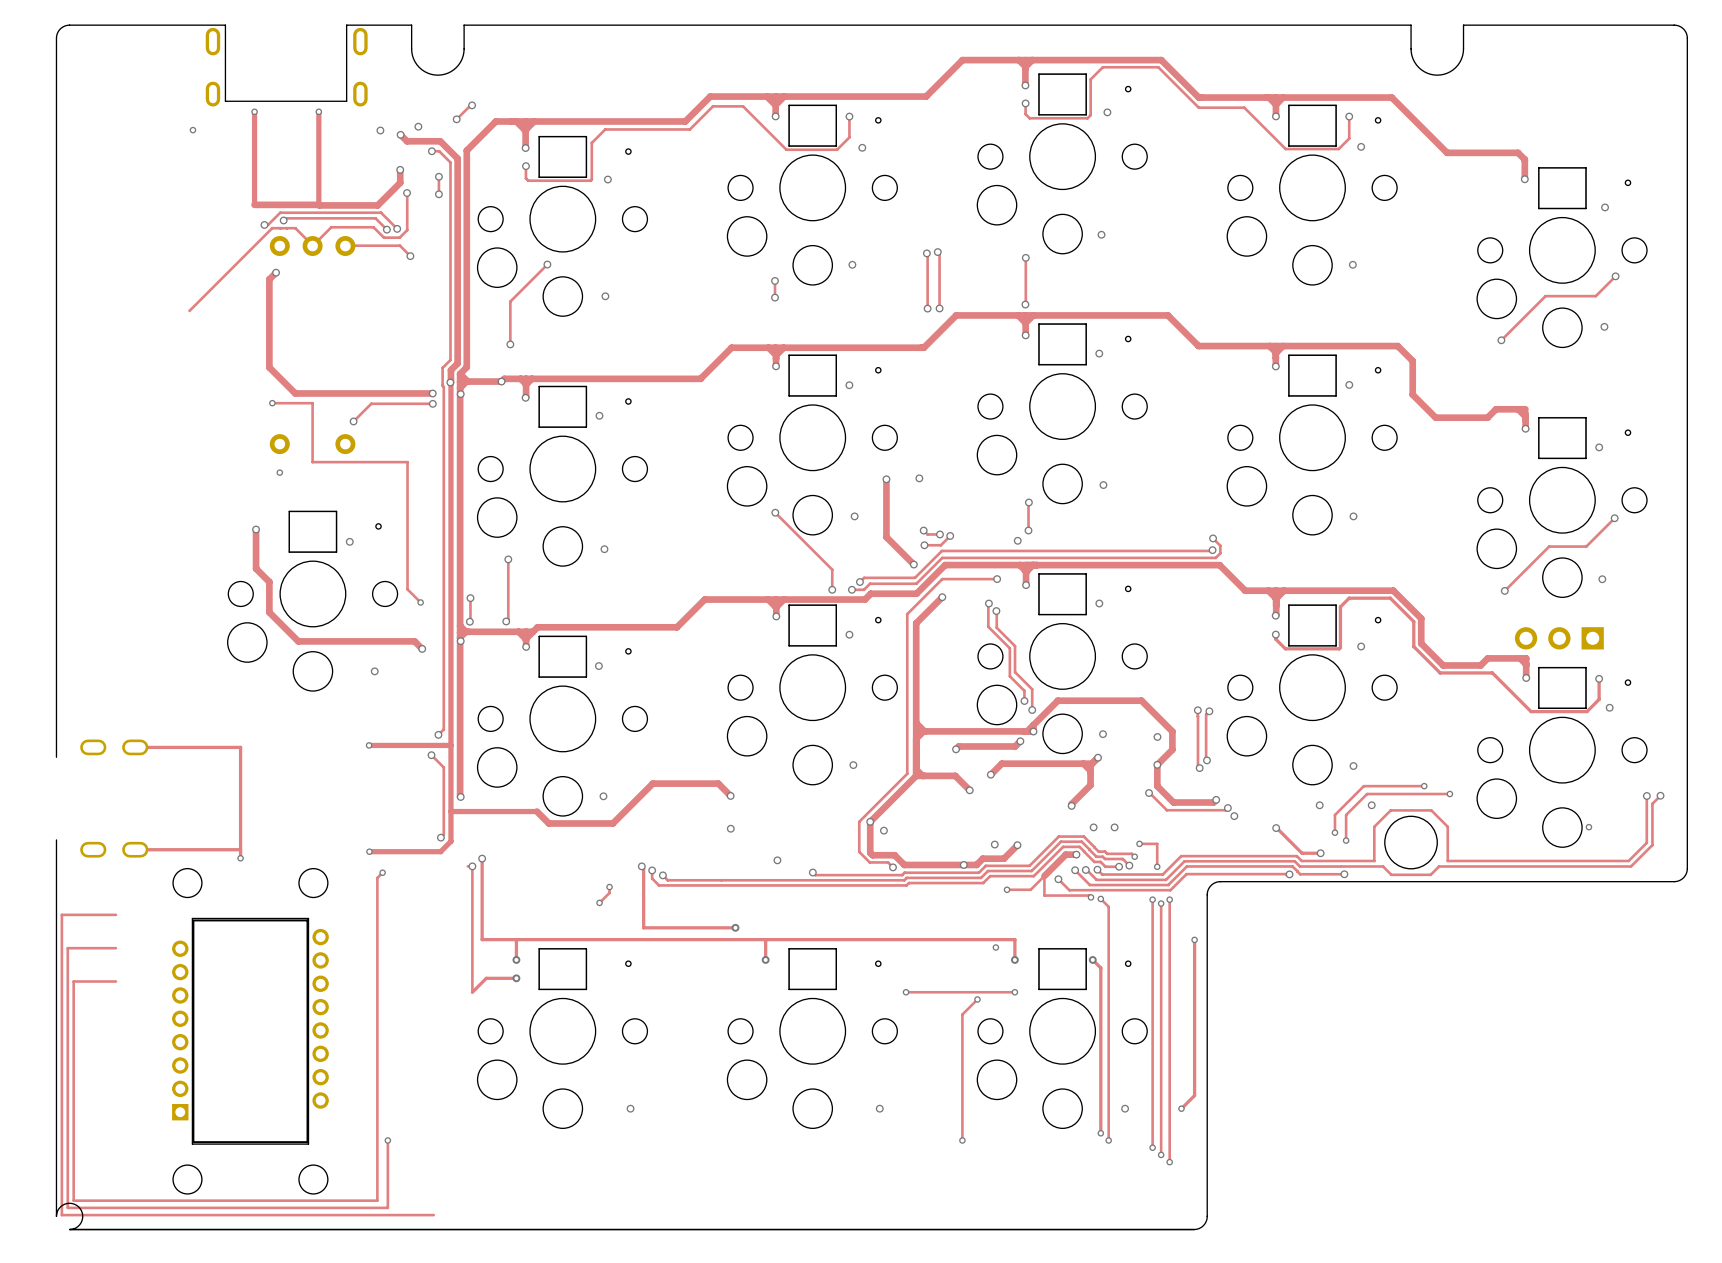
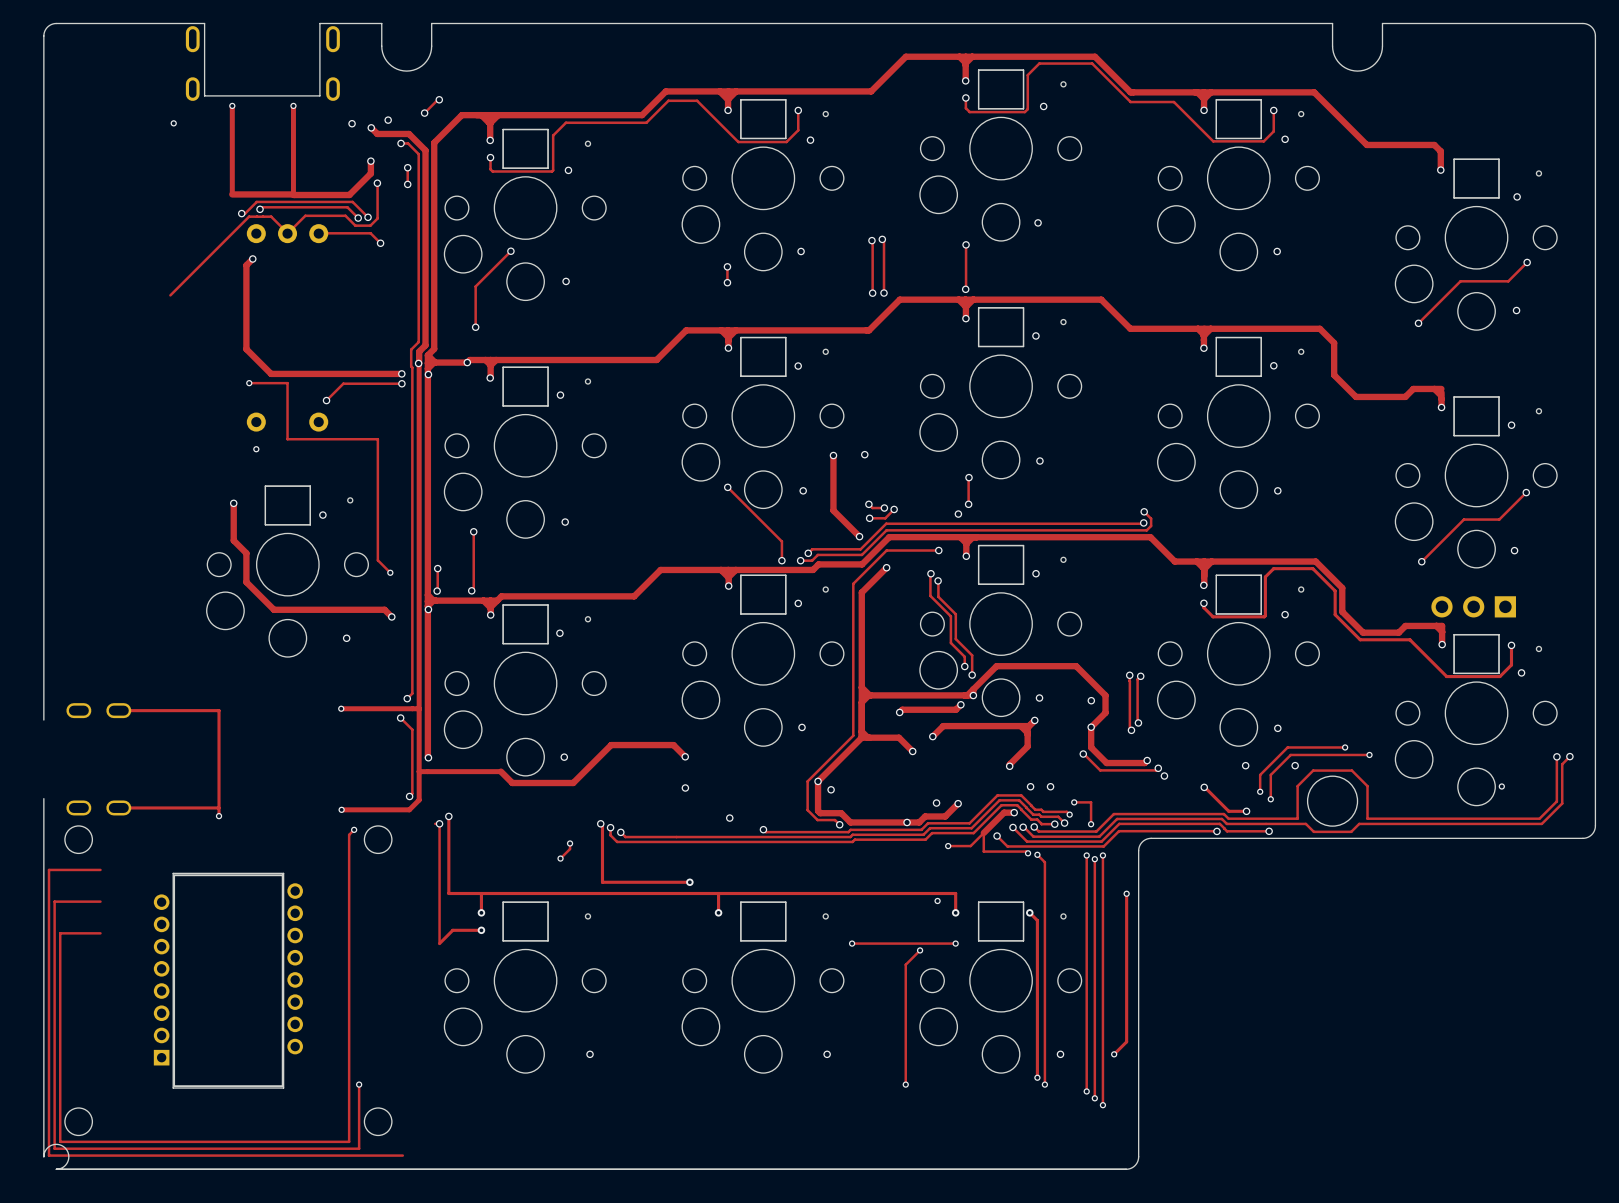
round board edge position: (187, 883) -> (78, 839)
round board edge position: (313, 883) -> (378, 839)
round board edge position: (187, 1179) -> (78, 1121)
round board edge position: (313, 1179) -> (378, 1121)

